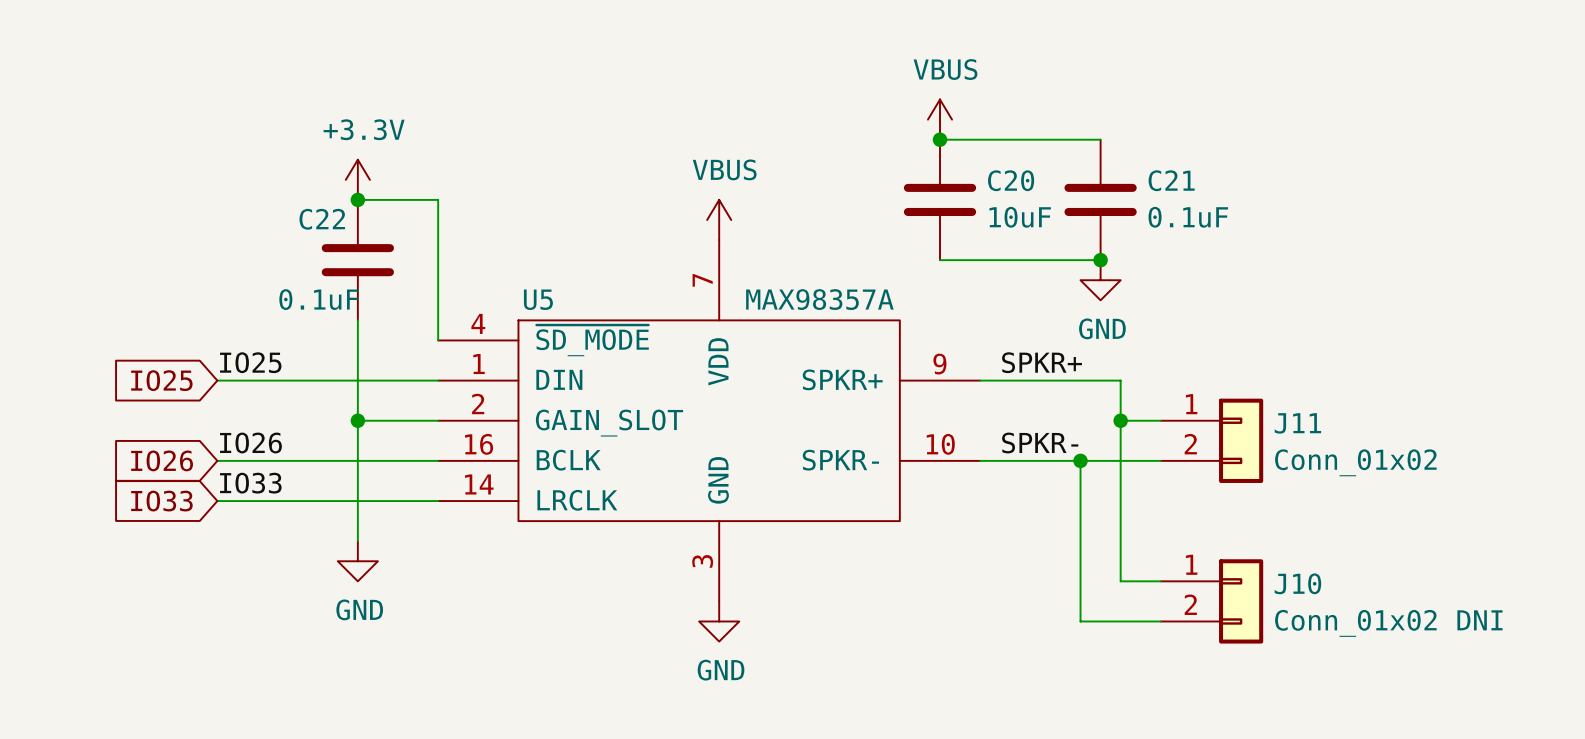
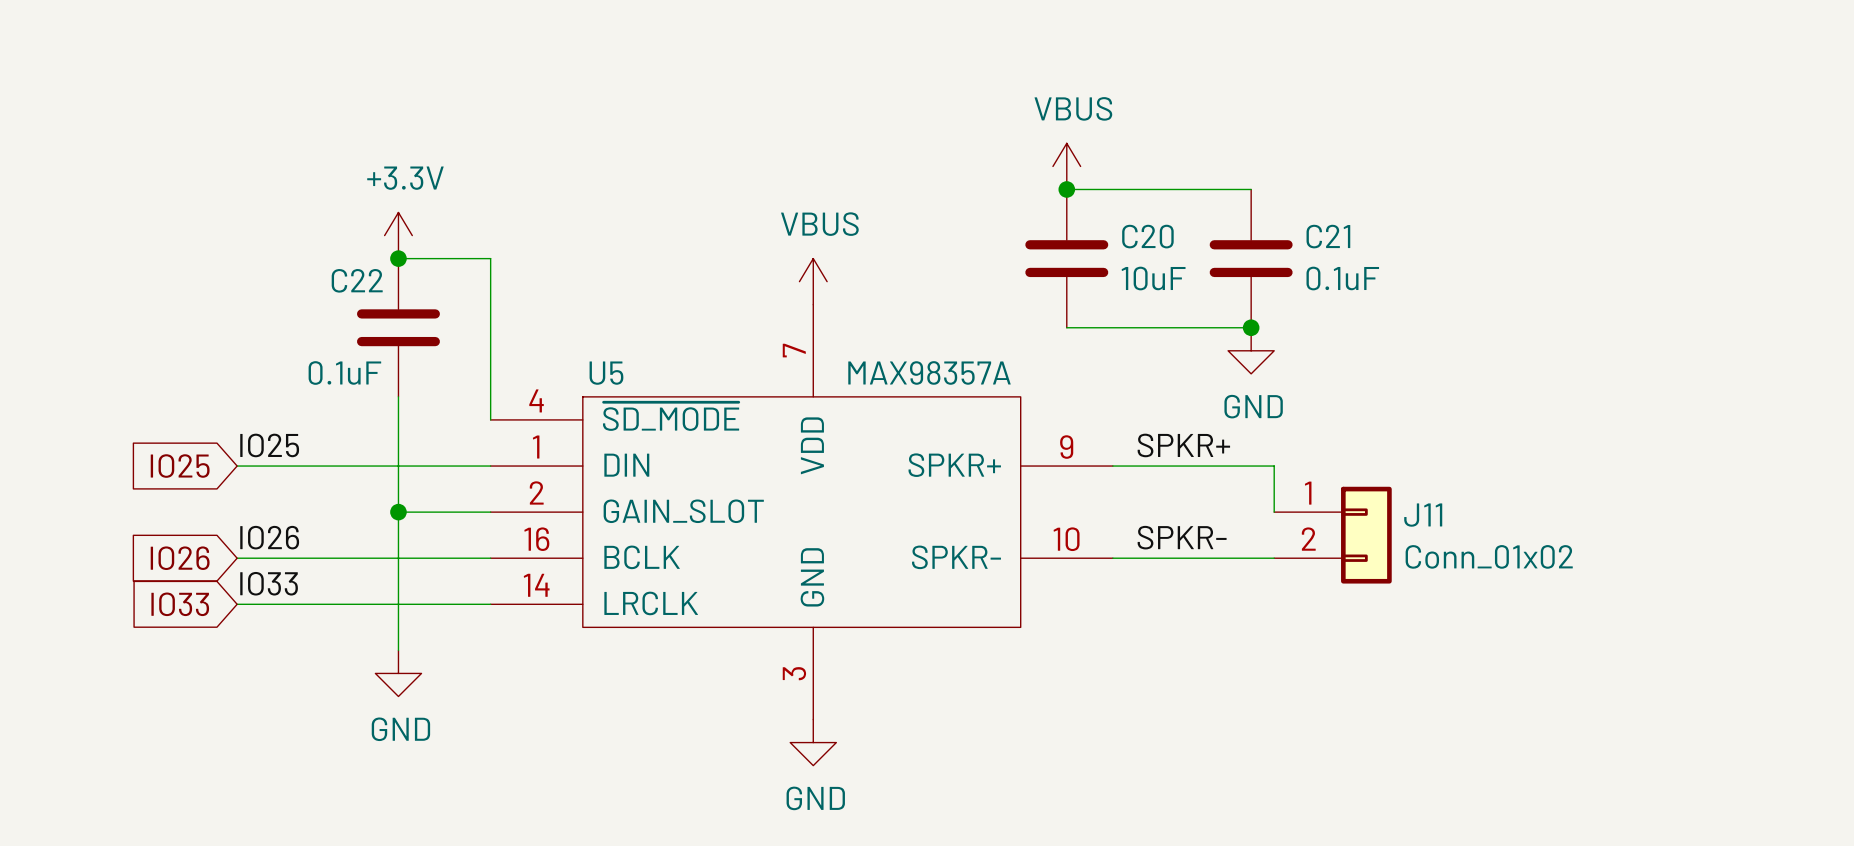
junction: (1120, 420) -> none
wire: (1160, 420) (1120, 420) (1120, 581) (1160, 581) -> none
J11 position: (1212, 440) -> (1332, 535)
wire: (1080, 460) (1080, 621) (1160, 621) -> none
junction: (1080, 460) -> none
J10: Conn_01x02 DNI (1212, 601) -> none

